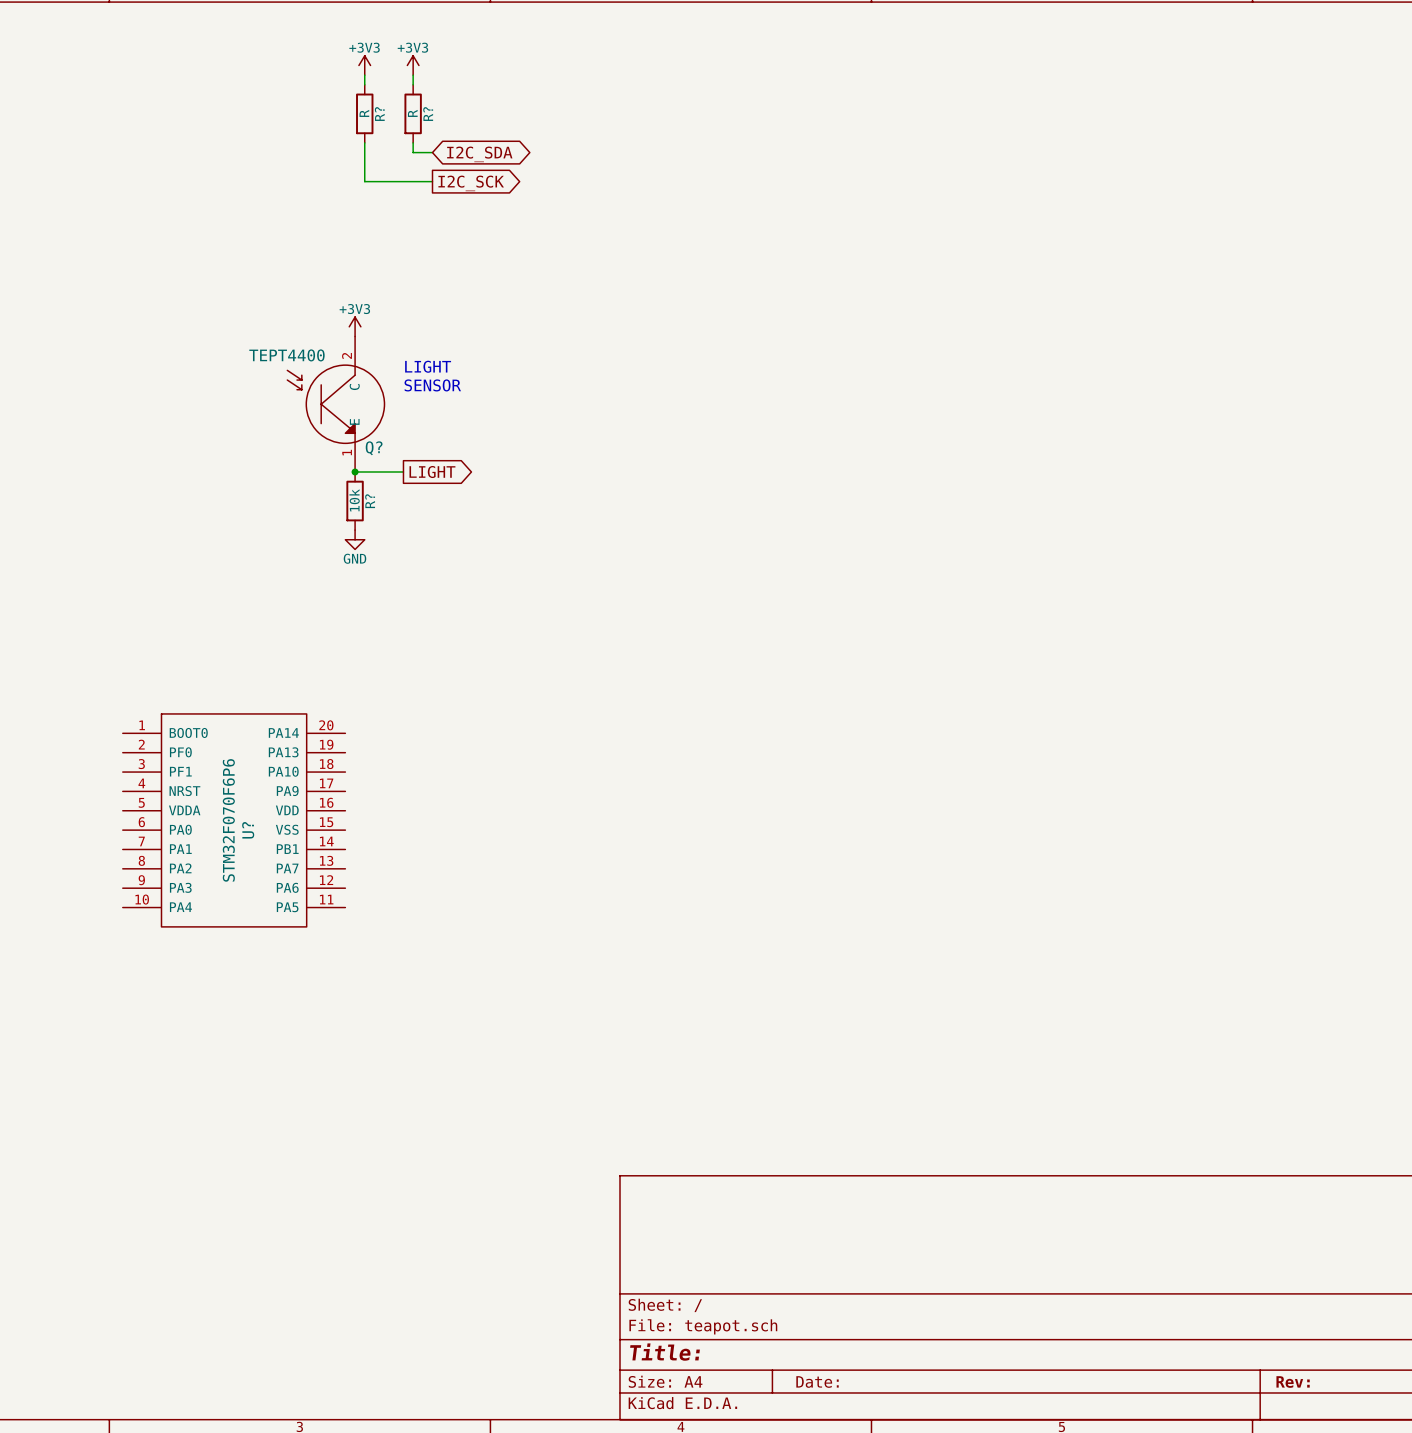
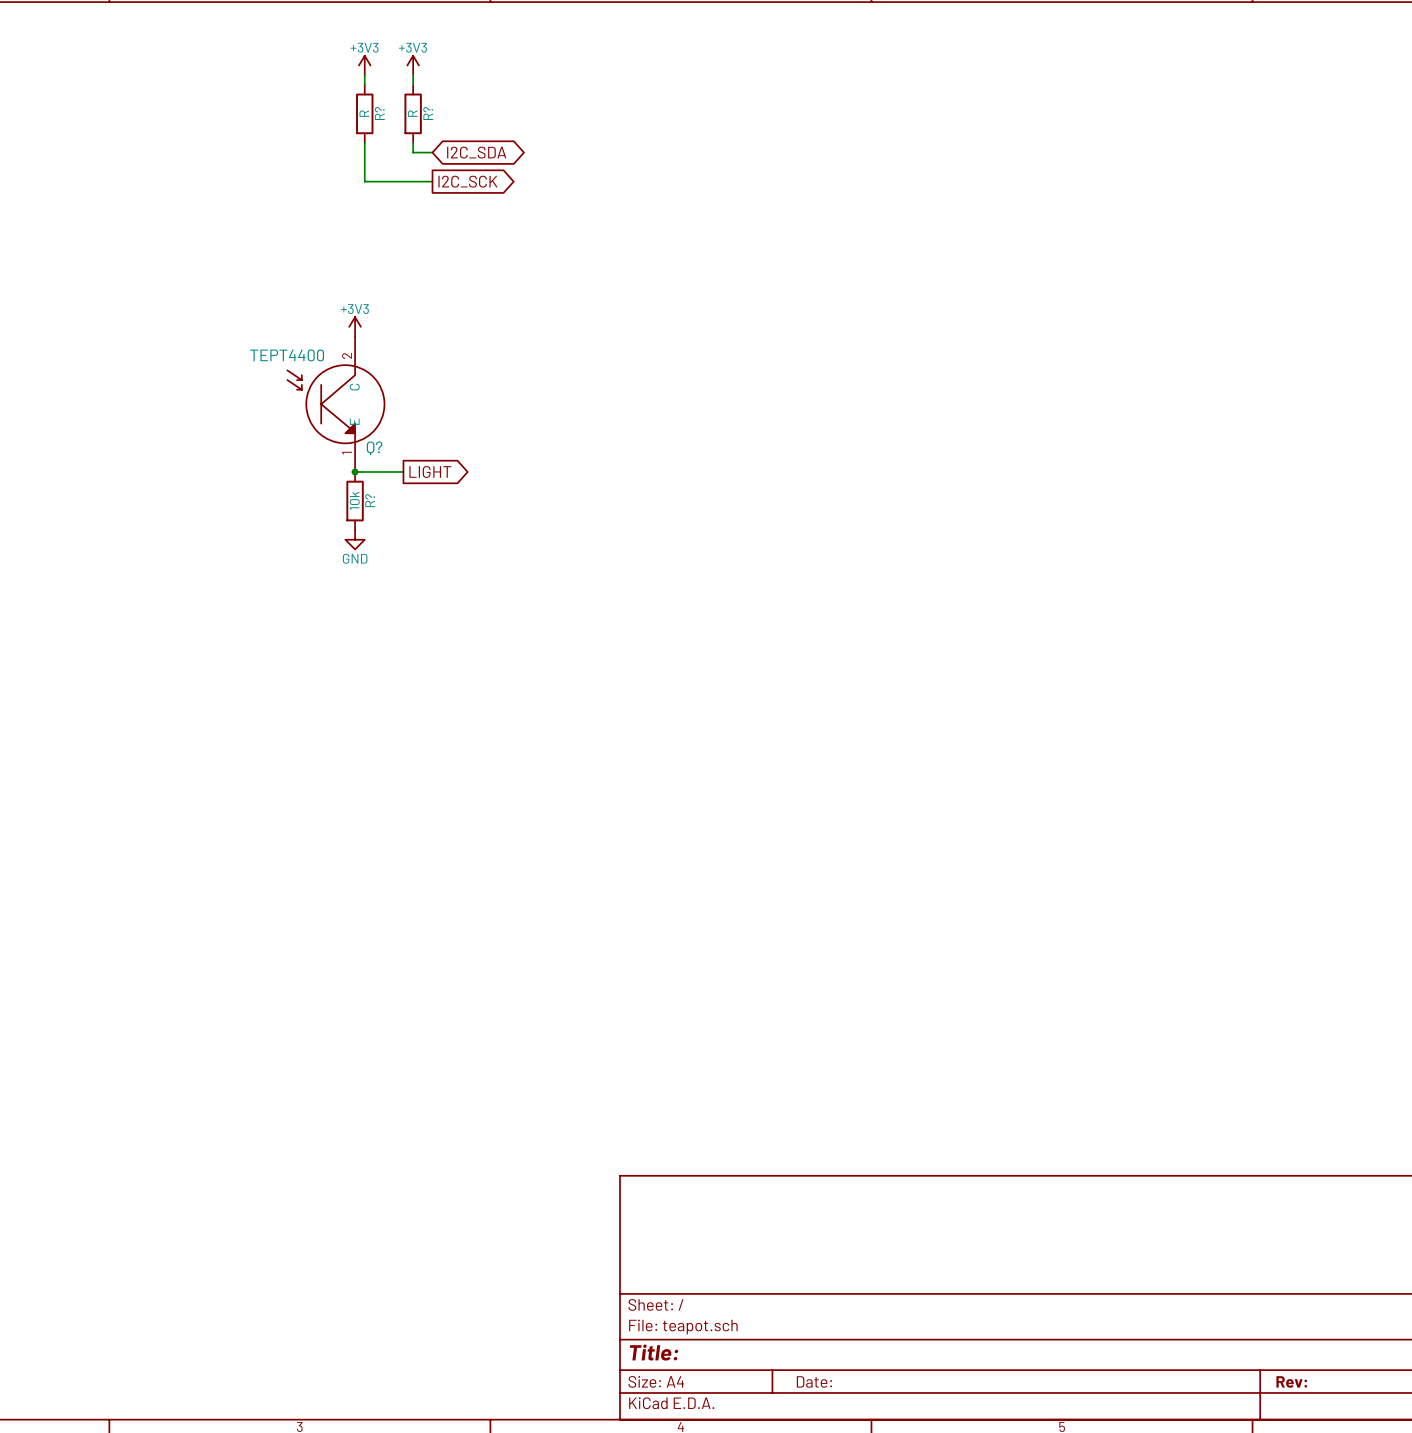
text: LIGHT (428, 366) -> none
text: SENSOR (432, 385) -> none
U?: STM32F070F6P6 (234, 820) -> none

